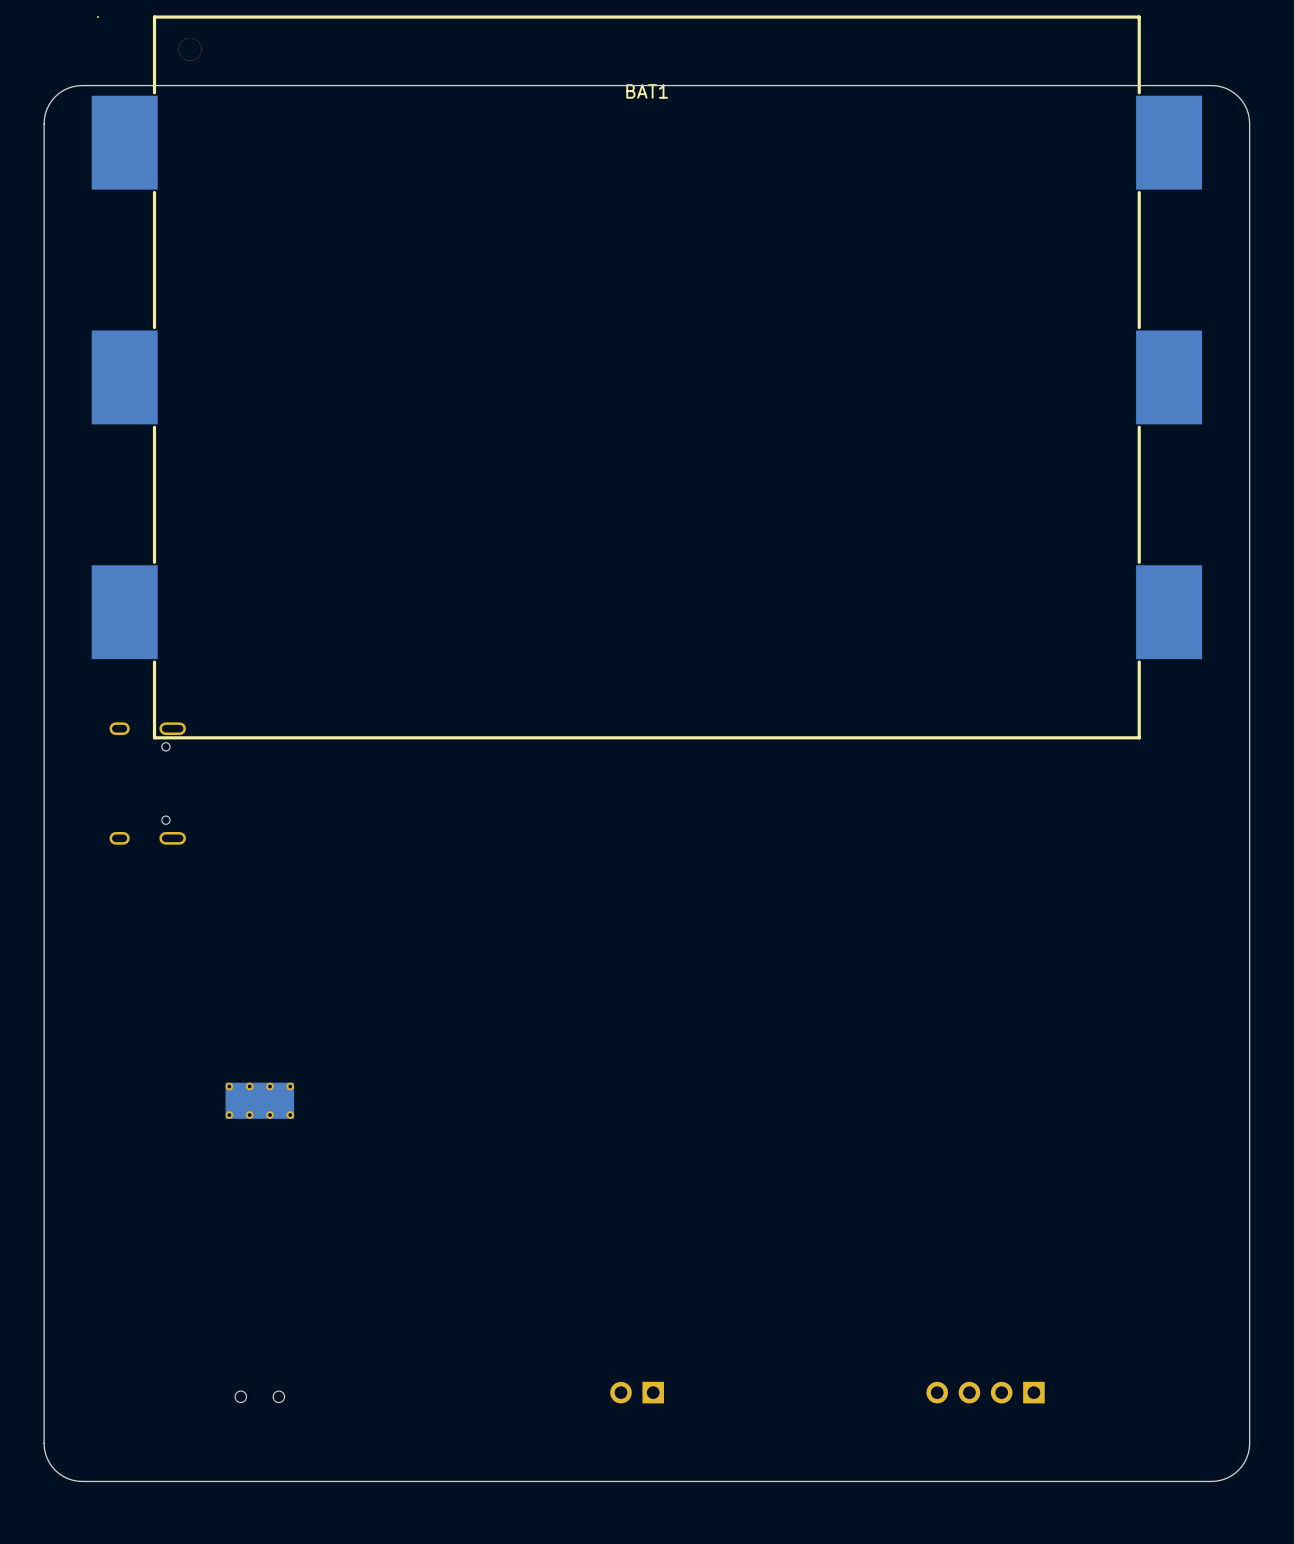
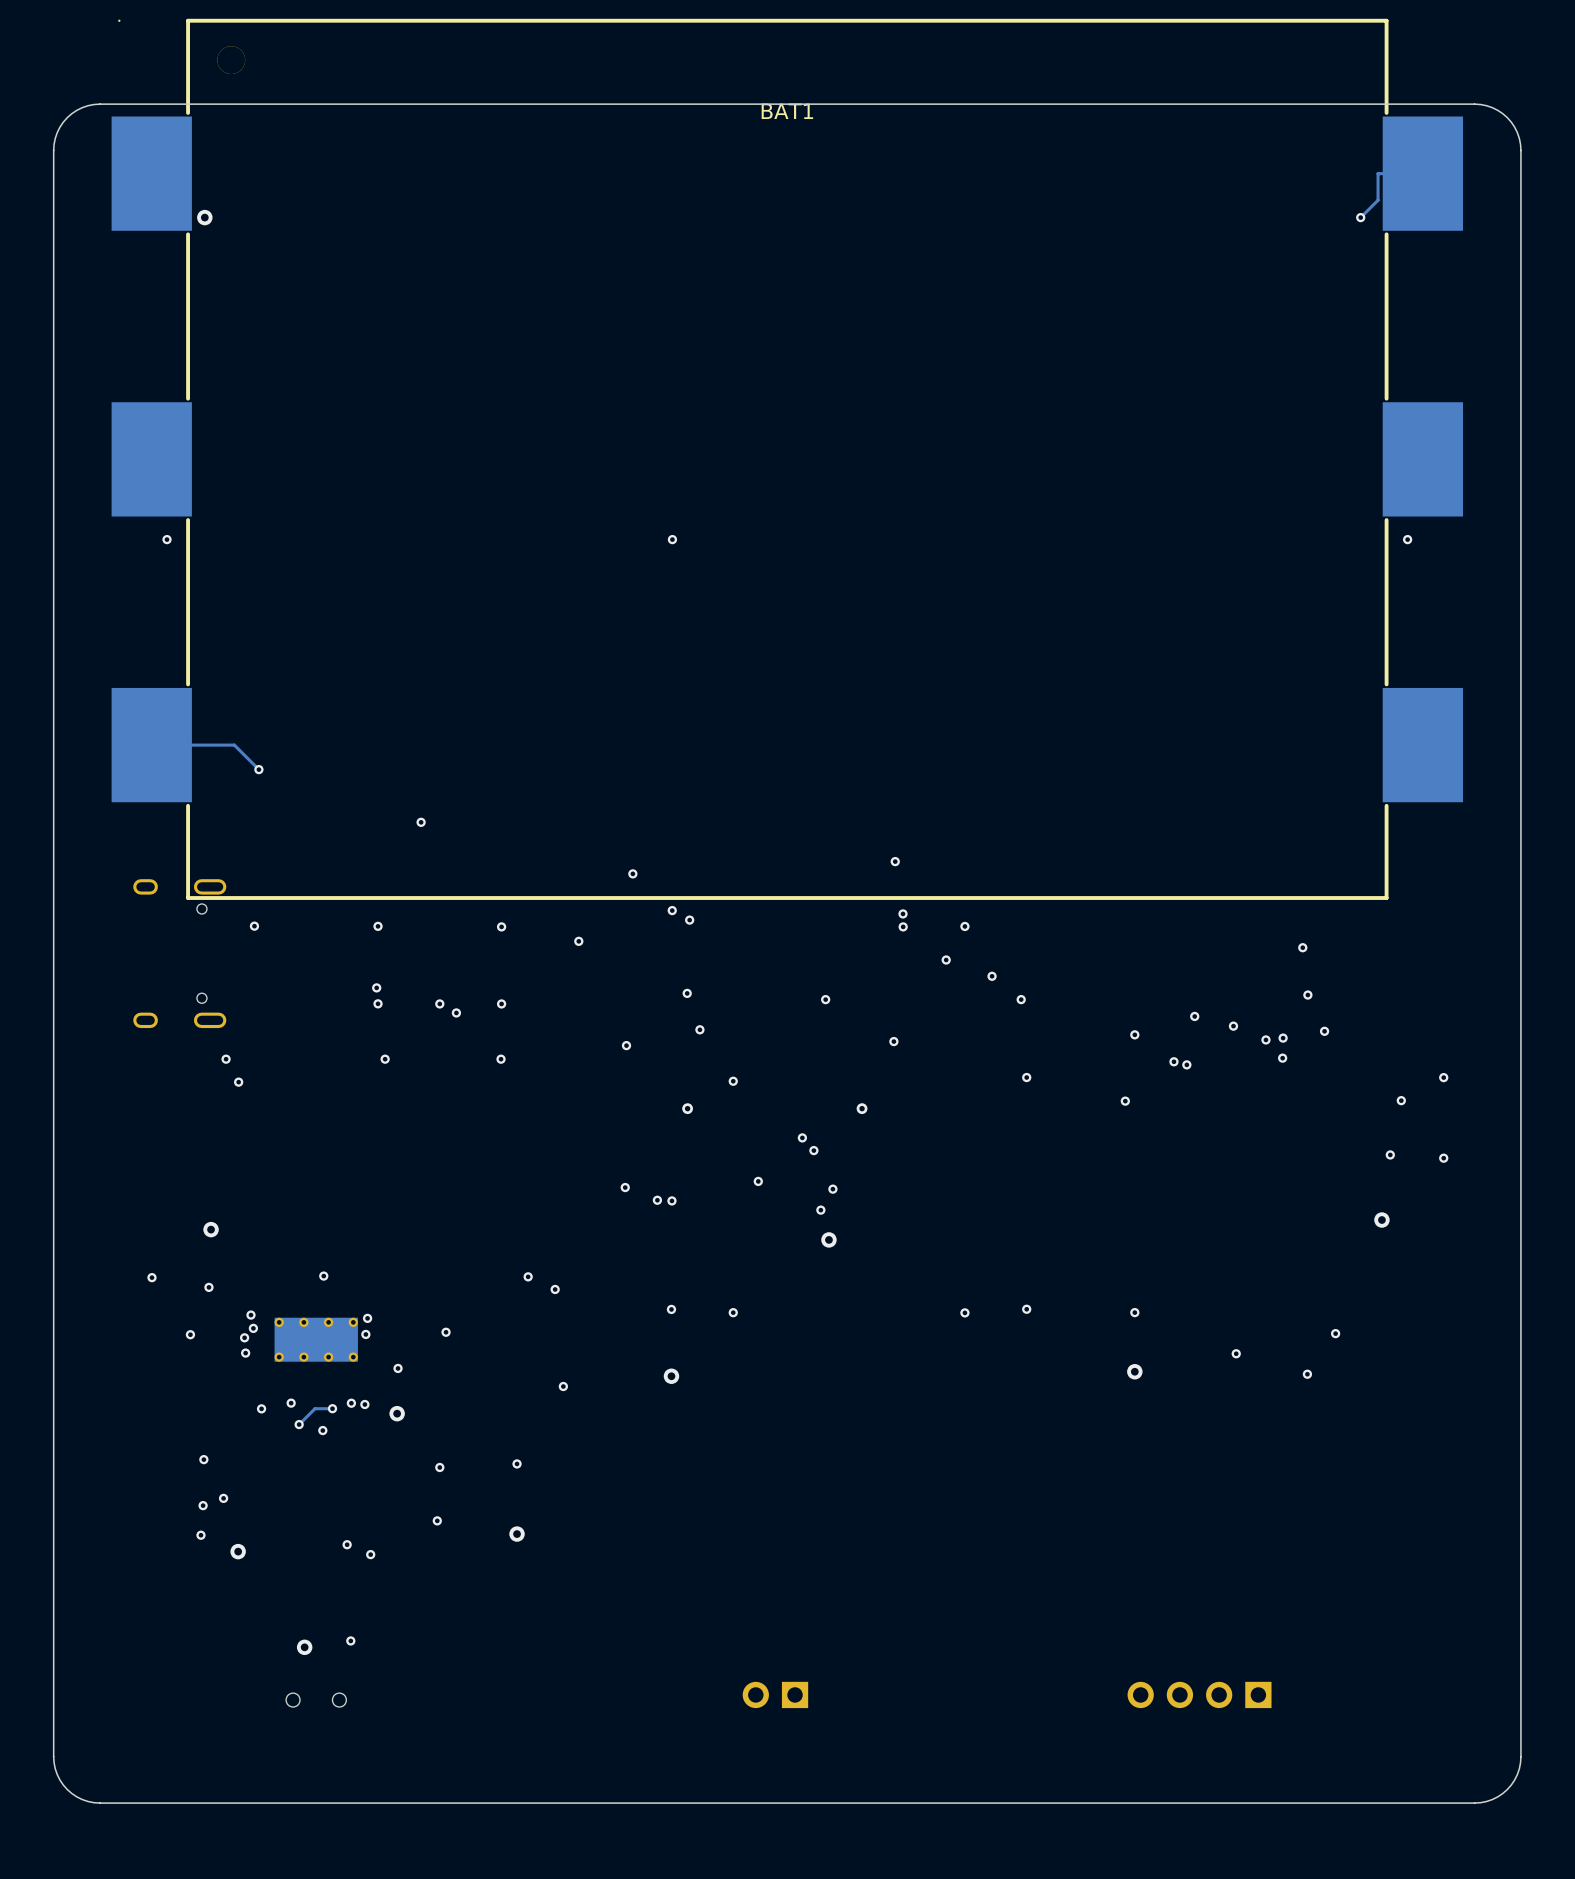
track: none -> (1422, 173) (1378, 173) (1378, 200) (1360, 217)
via: none -> (204, 217)
via: none -> (1360, 217)
via: none -> (167, 539)
via: none -> (672, 539)
via: none -> (1407, 539)
track: none -> (151, 745) (234, 745) (258, 769)
via: none -> (258, 769)
via: none -> (421, 822)
via: none -> (895, 861)
via: none -> (632, 873)
via: none -> (672, 910)
via: none -> (903, 913)
via: none -> (689, 920)
via: none -> (254, 926)
via: none -> (378, 926)
via: none -> (501, 926)
via: none -> (903, 926)
via: none -> (964, 926)
via: none -> (578, 941)
via: none -> (1302, 947)
via: none -> (946, 960)
via: none -> (992, 976)
via: none -> (376, 987)
via: none -> (687, 993)
via: none -> (1307, 995)
via: none -> (825, 999)
via: none -> (1021, 999)
via: none -> (378, 1003)
via: none -> (439, 1003)
via: none -> (501, 1003)
via: none -> (456, 1012)
via: none -> (1194, 1016)
via: none -> (1233, 1026)
via: none -> (699, 1029)
via: none -> (1324, 1031)
via: none -> (1134, 1034)
via: none -> (1283, 1038)
via: none -> (1265, 1039)
via: none -> (893, 1041)
via: none -> (626, 1045)
via: none -> (1282, 1058)
via: none -> (226, 1059)
via: none -> (385, 1059)
via: none -> (501, 1059)
via: none -> (1173, 1061)
via: none -> (1186, 1064)
via: none -> (1026, 1077)
via: none -> (1443, 1077)
via: none -> (733, 1081)
via: none -> (238, 1082)
via: none -> (1125, 1101)
via: none -> (1401, 1100)
via: none -> (687, 1108)
via: none -> (862, 1108)
via: none -> (802, 1137)
via: none -> (813, 1150)
via: none -> (1390, 1154)
via: none -> (1443, 1158)
via: none -> (758, 1181)
via: none -> (625, 1187)
via: none -> (832, 1189)
via: none -> (657, 1200)
via: none -> (671, 1200)
via: none -> (820, 1210)
via: none -> (1381, 1220)
via: none -> (211, 1229)
via: none -> (828, 1239)
via: none -> (323, 1276)
via: none -> (151, 1277)
via: none -> (528, 1276)
via: none -> (208, 1287)
via: none -> (555, 1289)
via: none -> (671, 1309)
via: none -> (1026, 1309)
via: none -> (733, 1312)
via: none -> (964, 1312)
via: none -> (1134, 1312)
via: none -> (250, 1315)
via: none -> (367, 1318)
via: none -> (253, 1328)
via: none -> (446, 1332)
via: none -> (1335, 1333)
via: none -> (190, 1334)
via: none -> (365, 1334)
via: none -> (244, 1337)
via: none -> (245, 1353)
via: none -> (1236, 1353)
via: none -> (398, 1368)
via: none -> (1134, 1371)
via: none -> (1307, 1374)
via: none -> (671, 1376)
via: none -> (563, 1386)
via: none -> (291, 1403)
via: none -> (351, 1403)
via: none -> (364, 1404)
via: none -> (261, 1408)
track: none -> (332, 1408) (315, 1408) (299, 1424)
via: none -> (332, 1408)
via: none -> (397, 1413)
via: none -> (299, 1424)
via: none -> (322, 1430)
via: none -> (203, 1459)
via: none -> (517, 1463)
via: none -> (439, 1467)
via: none -> (223, 1498)
via: none -> (203, 1505)
via: none -> (437, 1520)
via: none -> (517, 1534)
via: none -> (200, 1535)
via: none -> (347, 1544)
via: none -> (238, 1551)
via: none -> (370, 1554)
via: none -> (350, 1640)
via: none -> (304, 1647)

